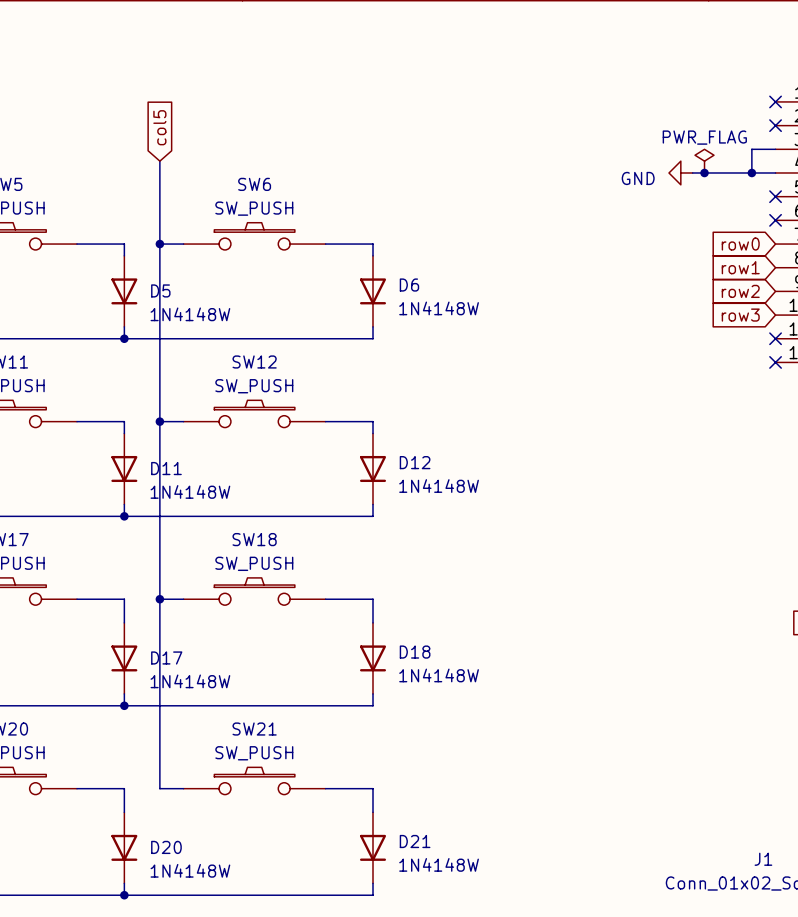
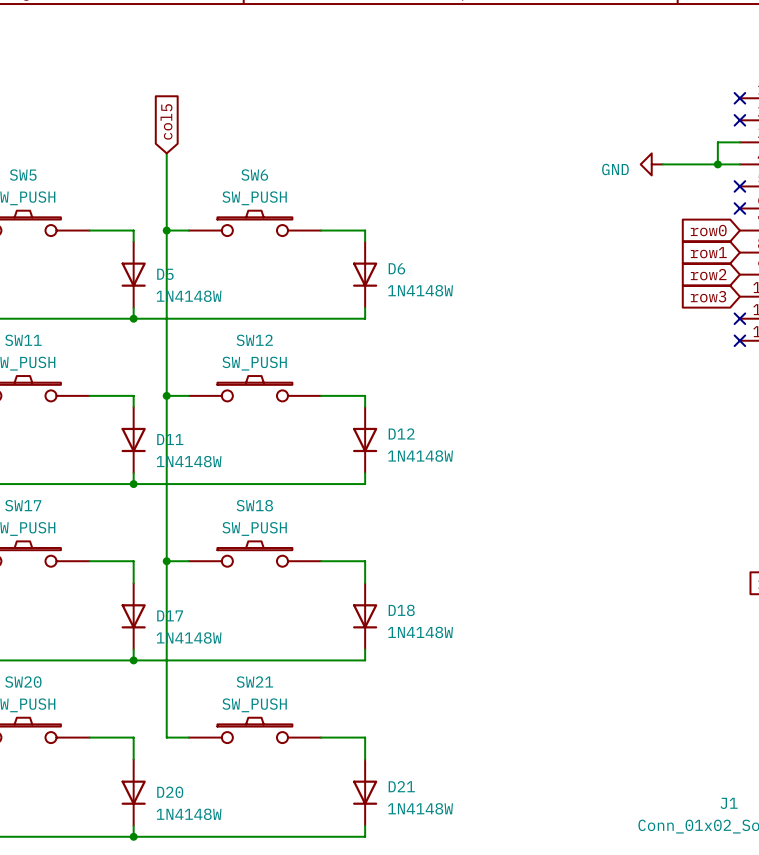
power symbol: PWR_FLAG (704, 161) -> none
junction: (704, 172) -> none

